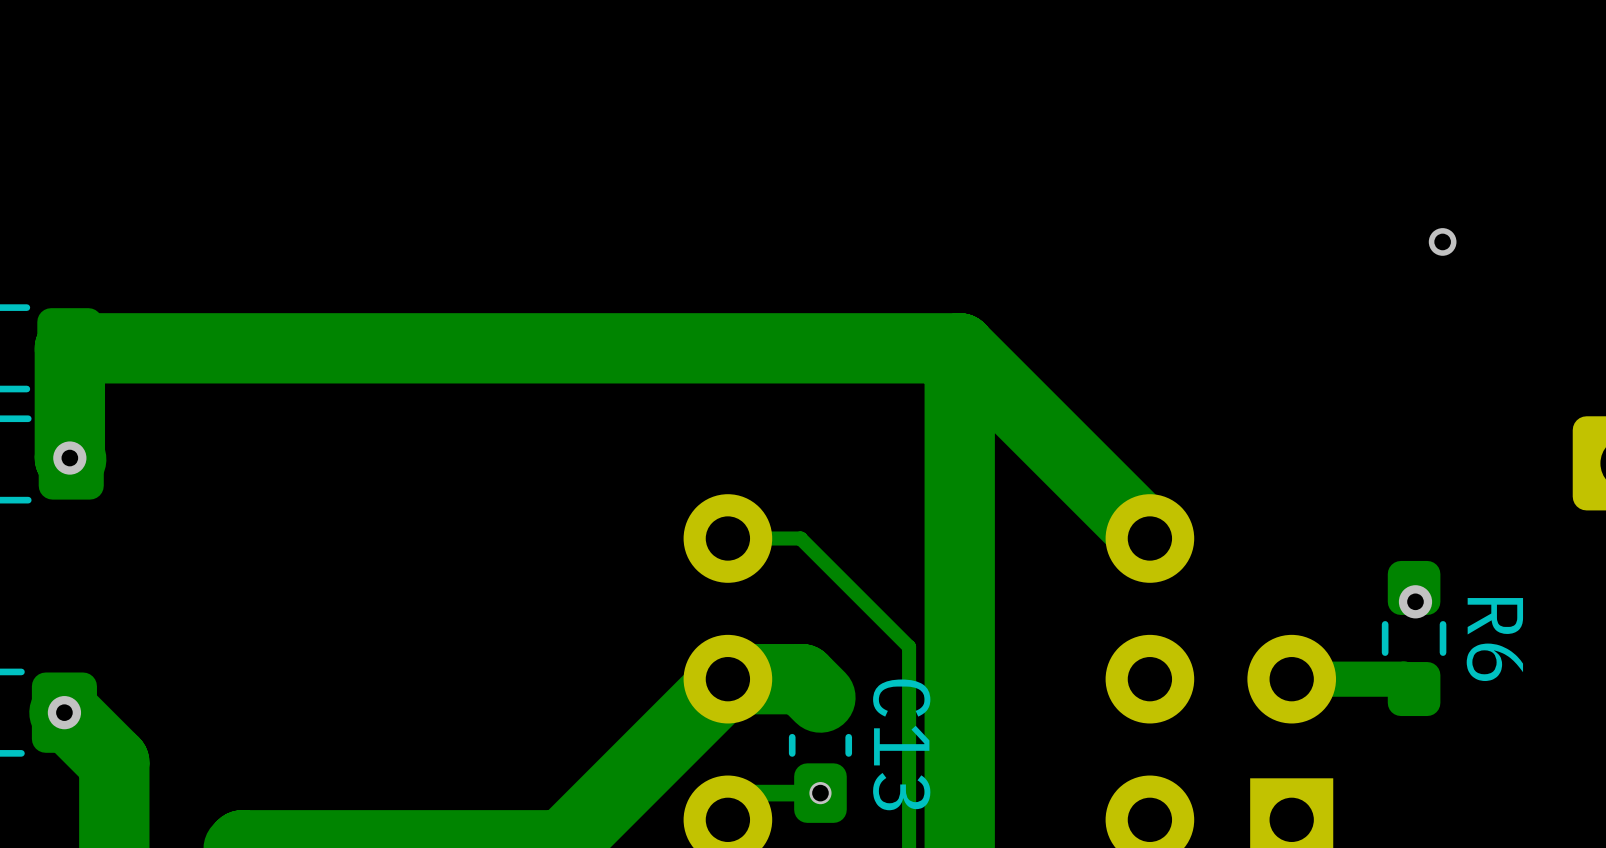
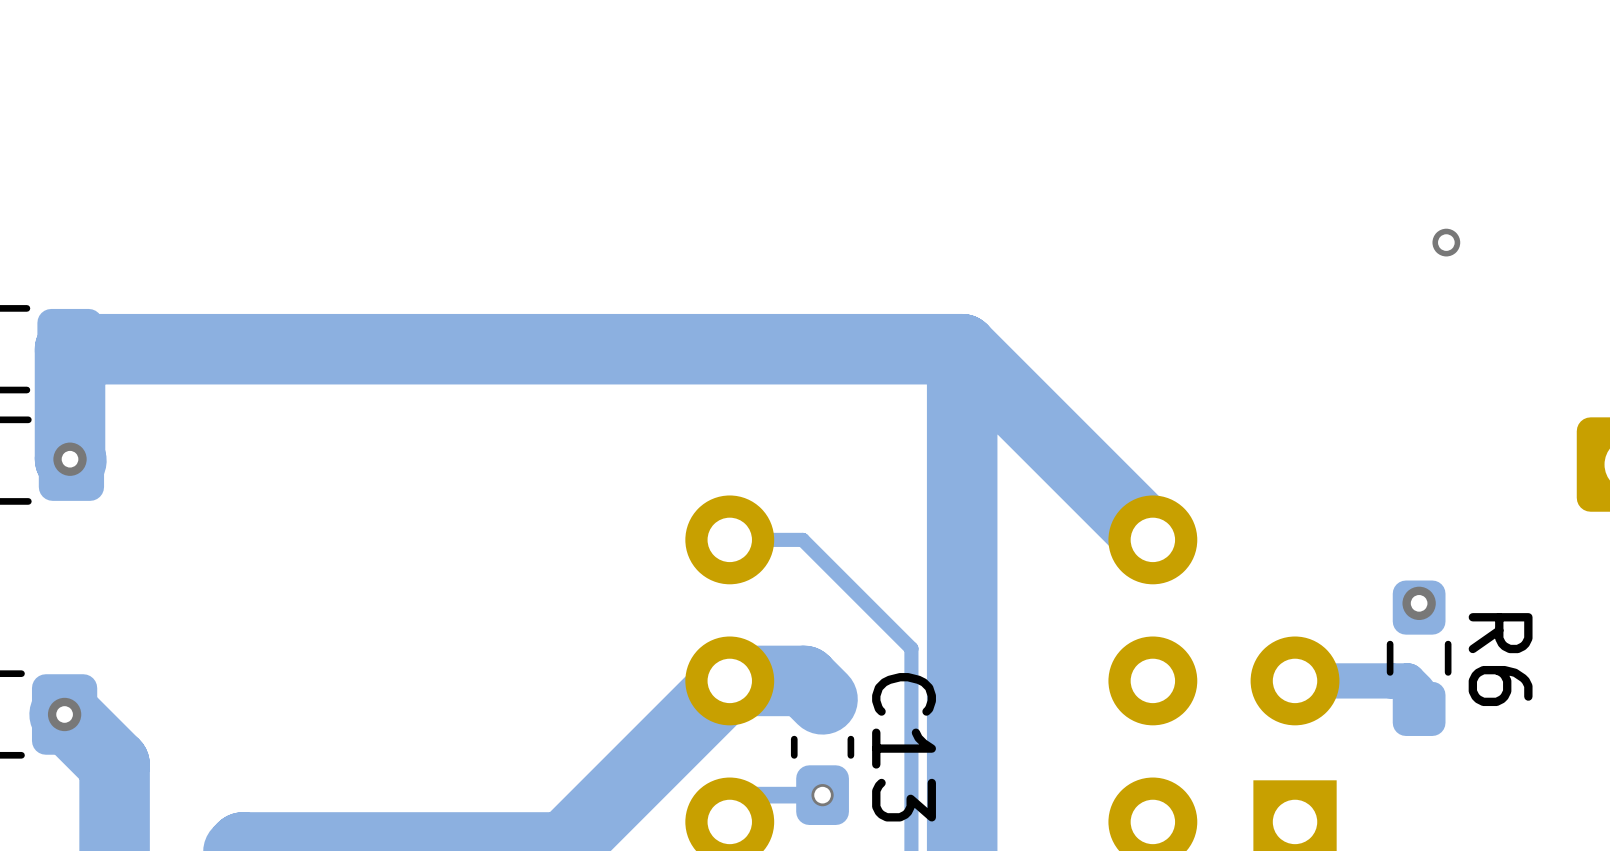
R6 position: (1414, 638) -> (1419, 658)

